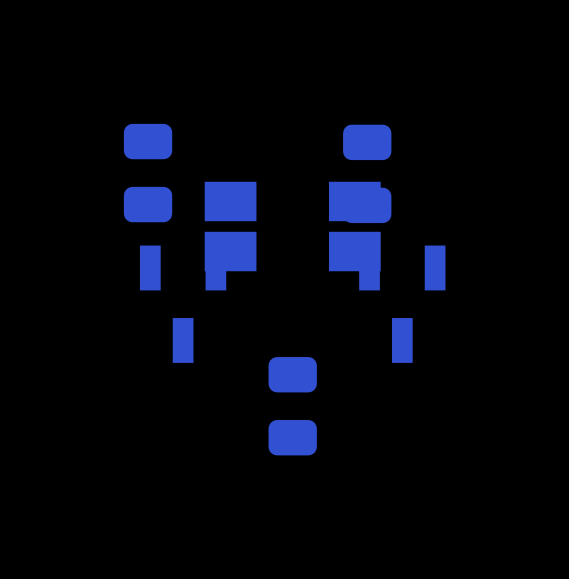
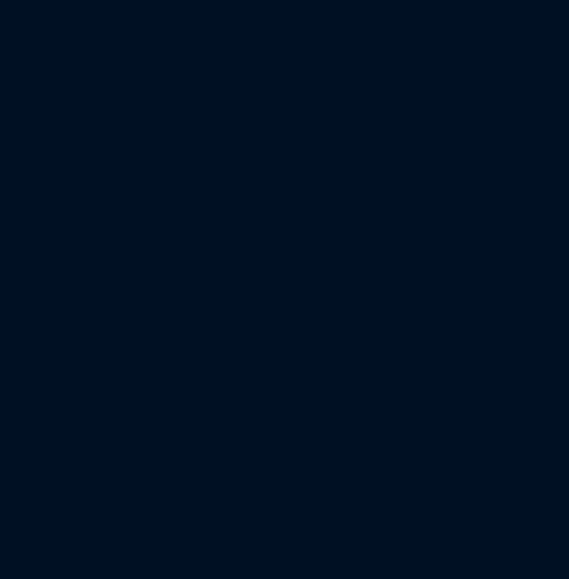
part: (148, 173) -> none
part: (367, 173) -> none
part: (292, 226) -> none
part: (183, 304) -> none
part: (402, 304) -> none
part: (292, 406) -> none

